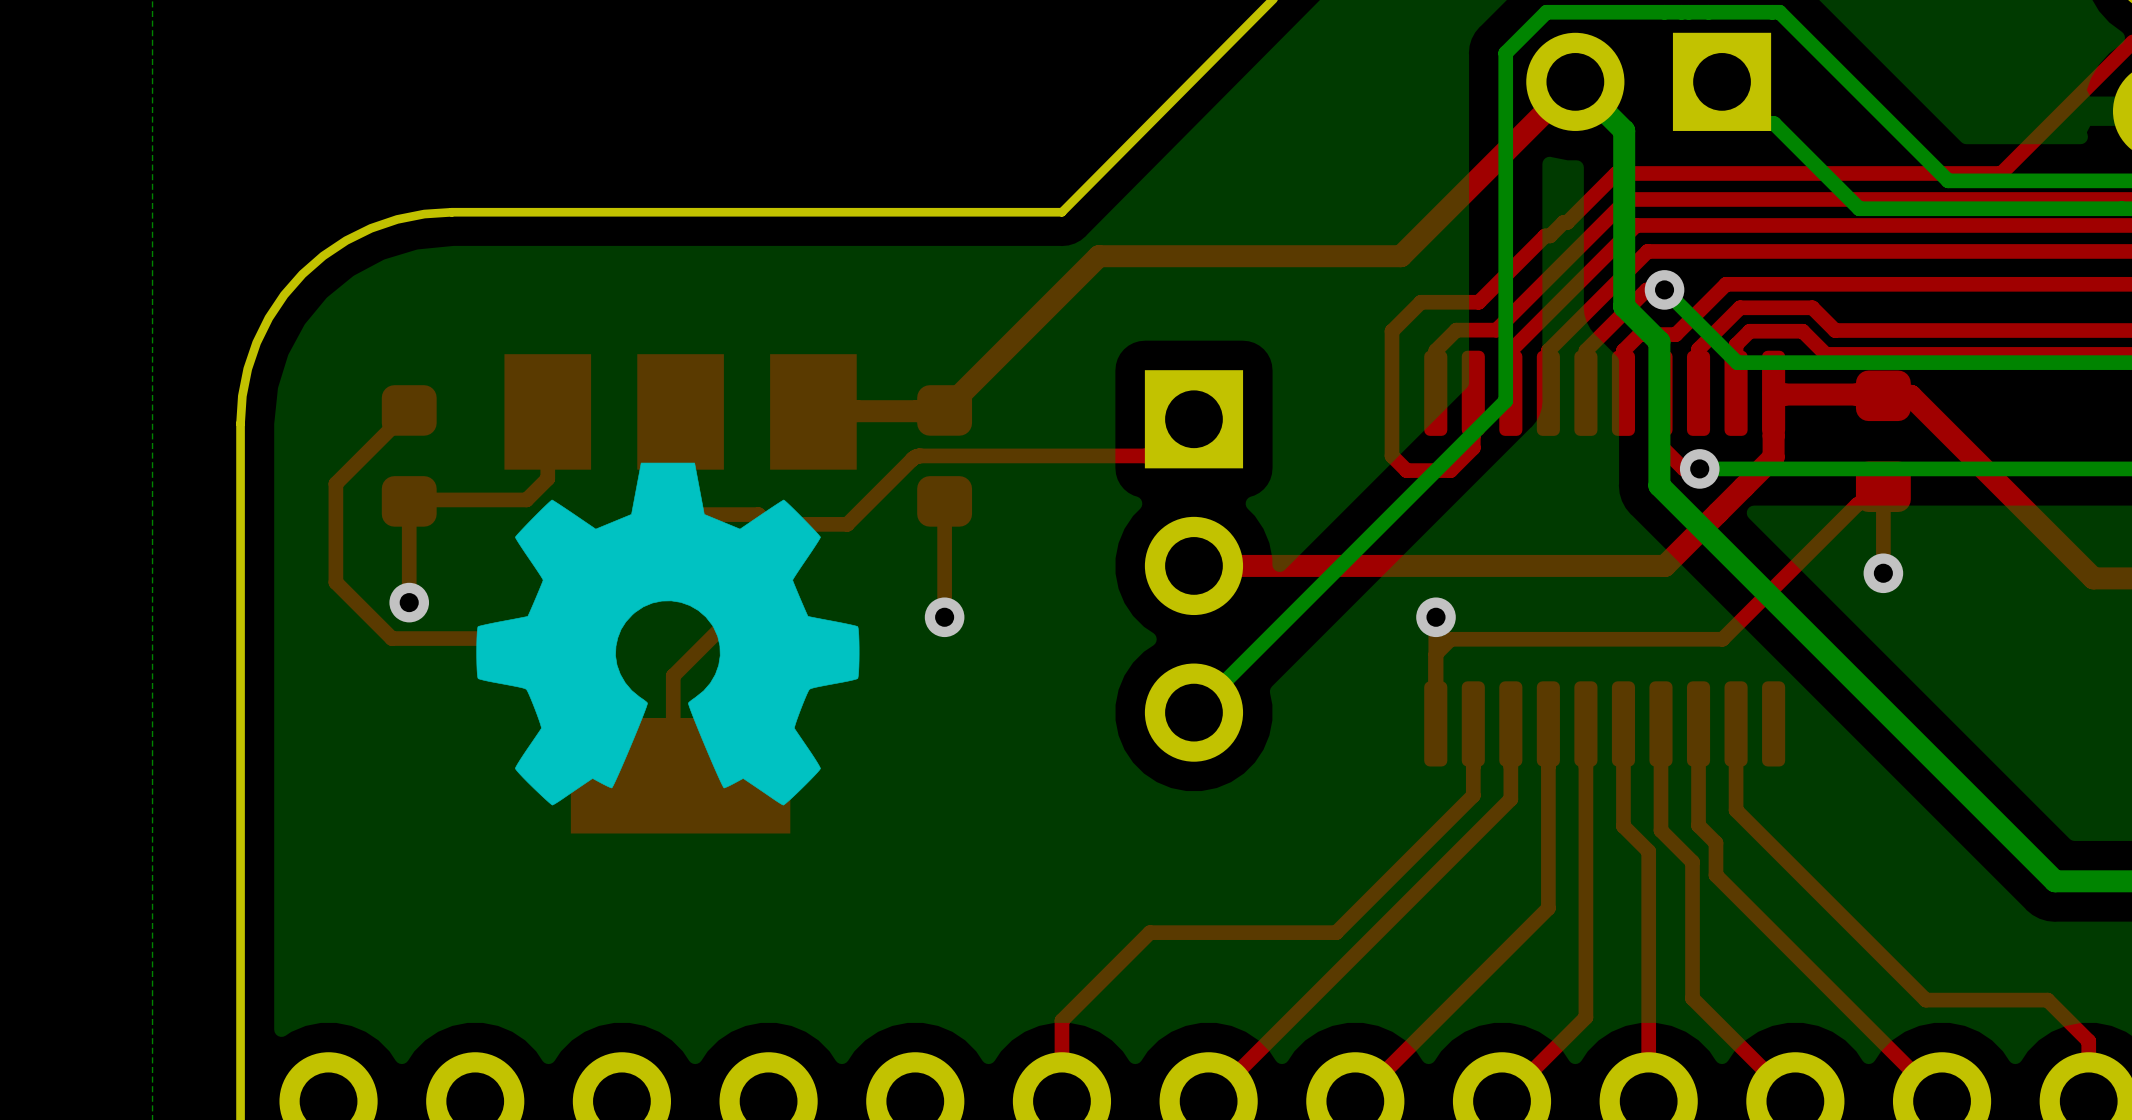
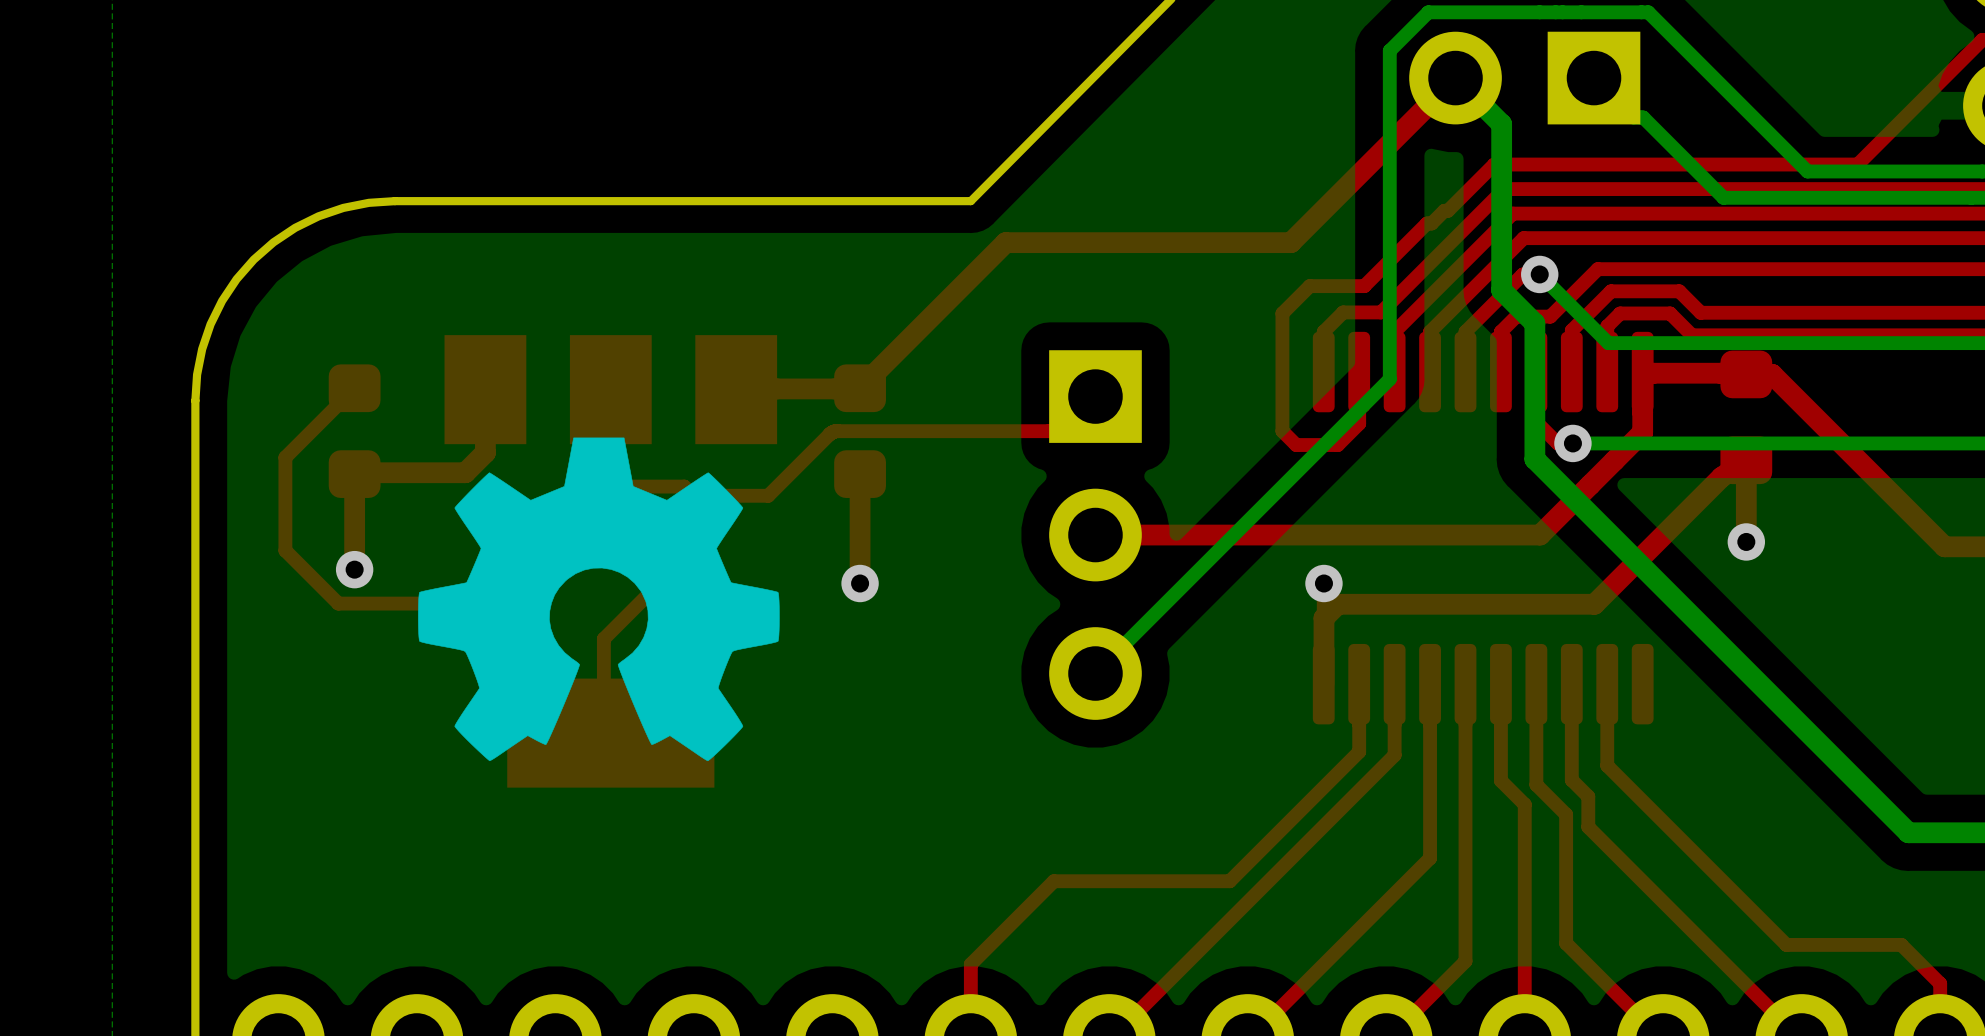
top track width: thin (547, 411) (547, 478) (526, 499) (409, 501) (409, 602) -> thick (485, 389) (485, 452) (465, 472) (354, 474) (354, 569)
top track width: thin (944, 501) (944, 617) -> thick (860, 474) (860, 583)
top track width: thin (1883, 573) (1883, 486) (1857, 504) (1722, 639) (1450, 639) (1436, 653) (1436, 723) -> thick (1746, 541) (1746, 460) (1721, 477) (1594, 604) (1337, 604) (1323, 618) (1323, 683)

